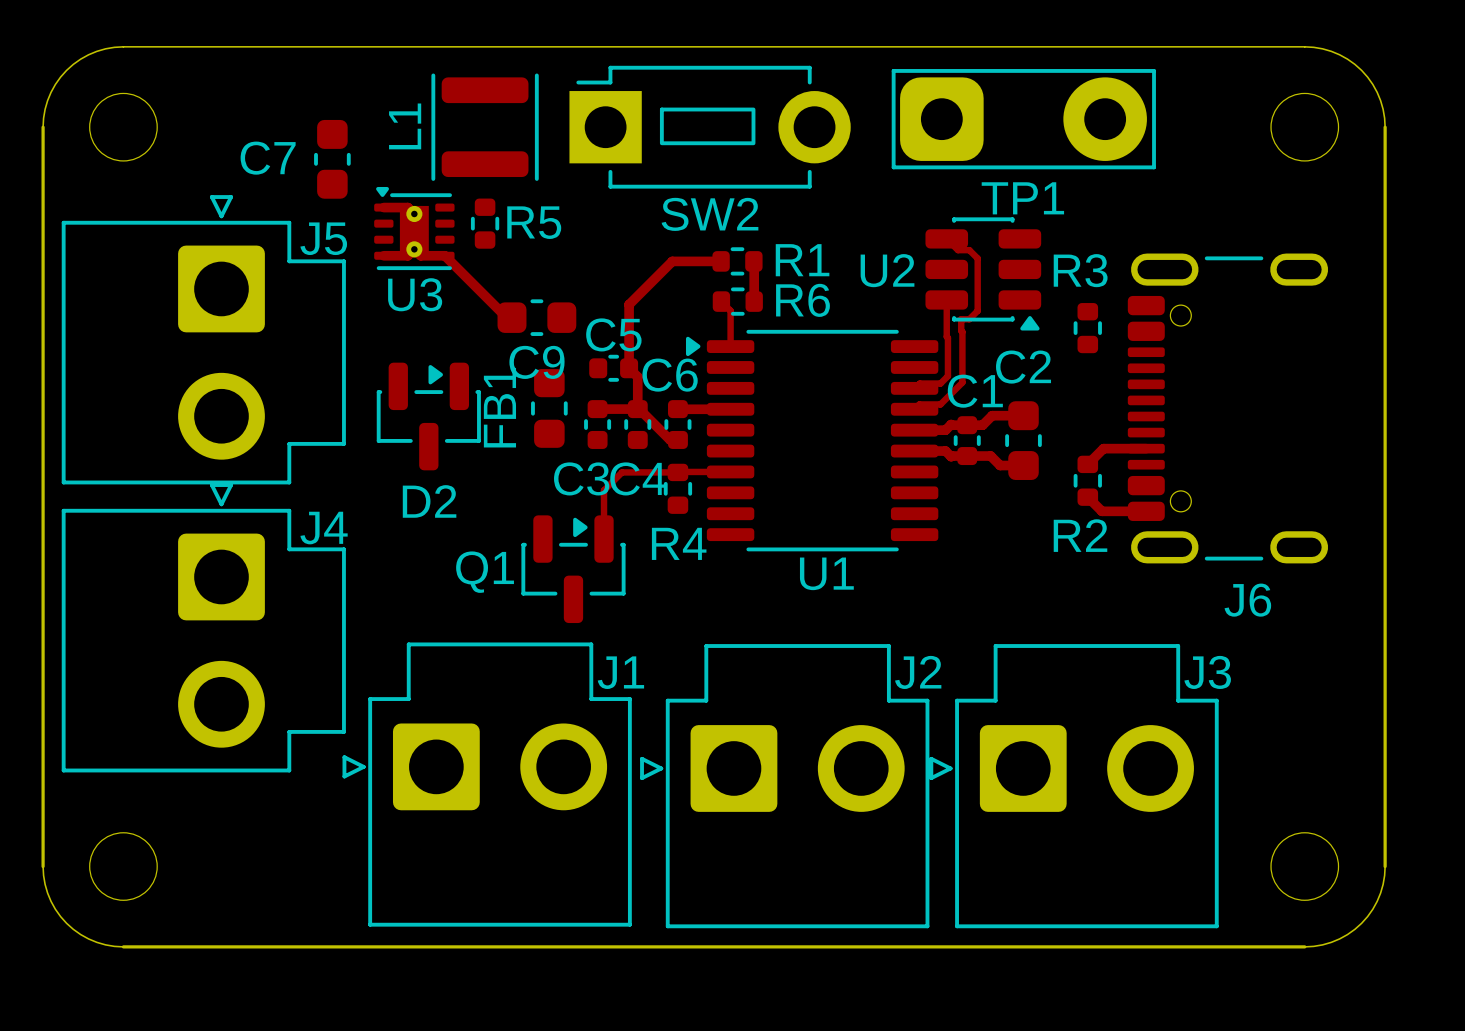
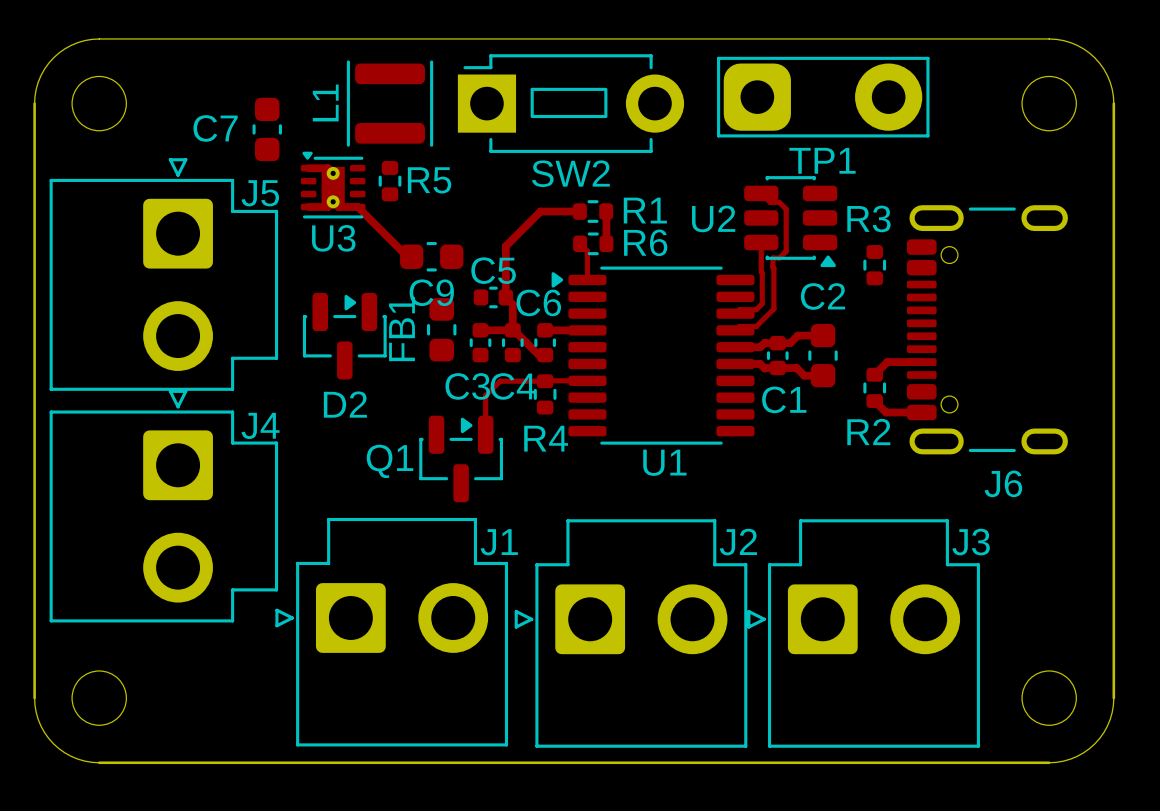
C1 name position: C1 (975, 391) -> C1 (784, 399)

